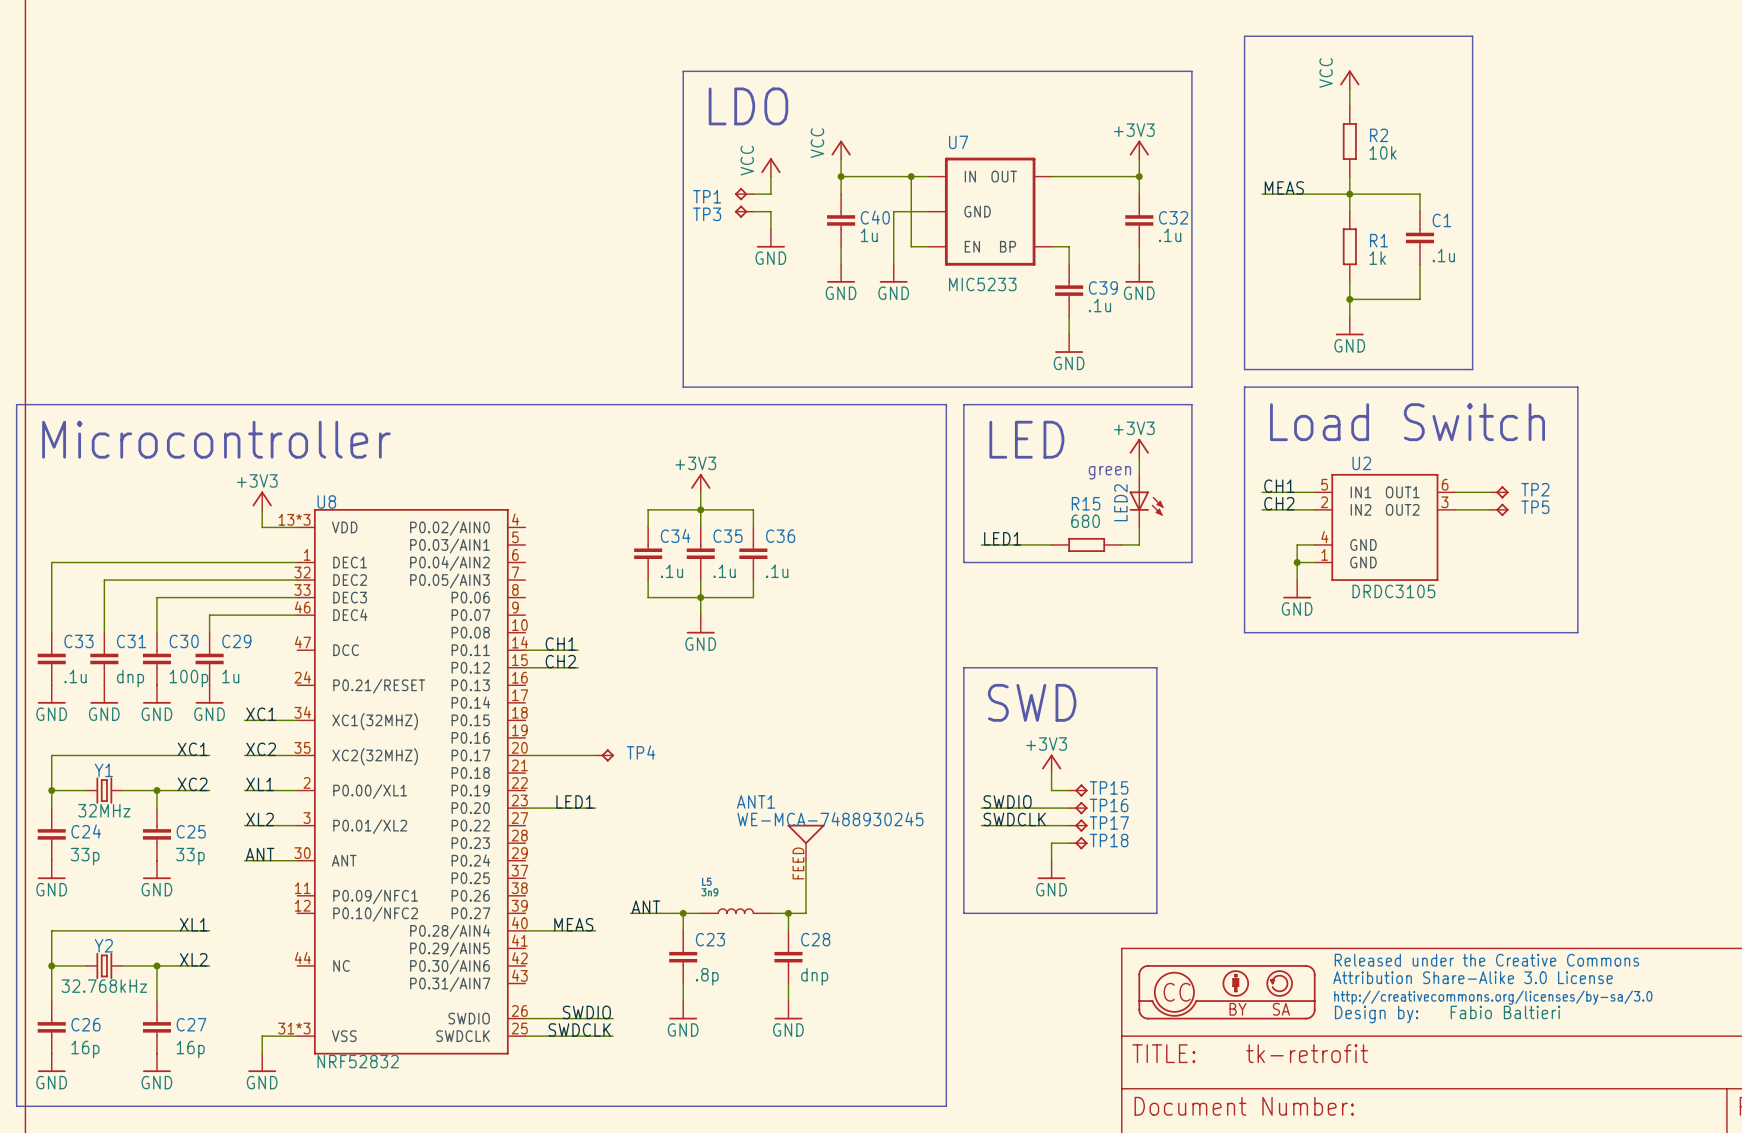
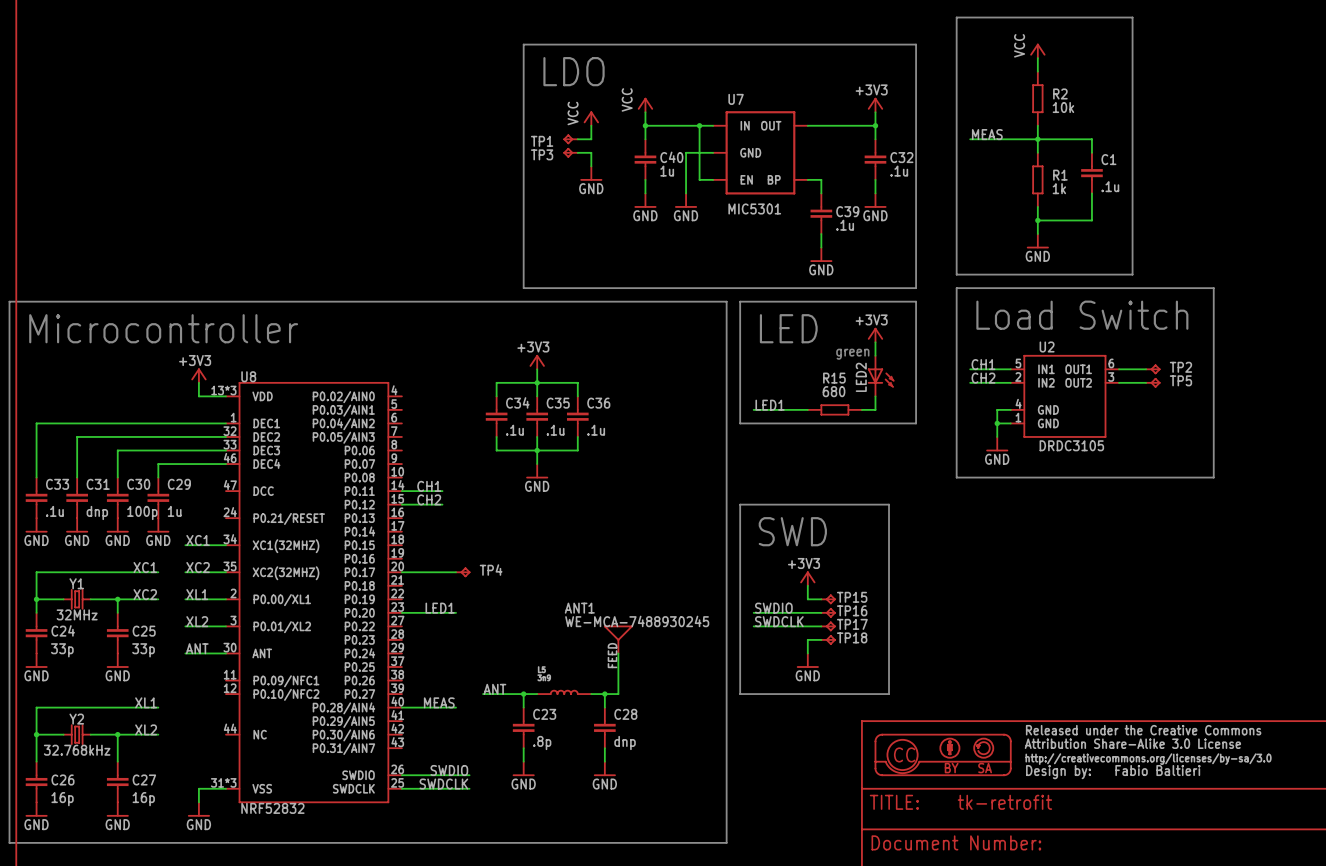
U7 value: MIC5233 (982, 284) -> MIC5301 (754, 208)

